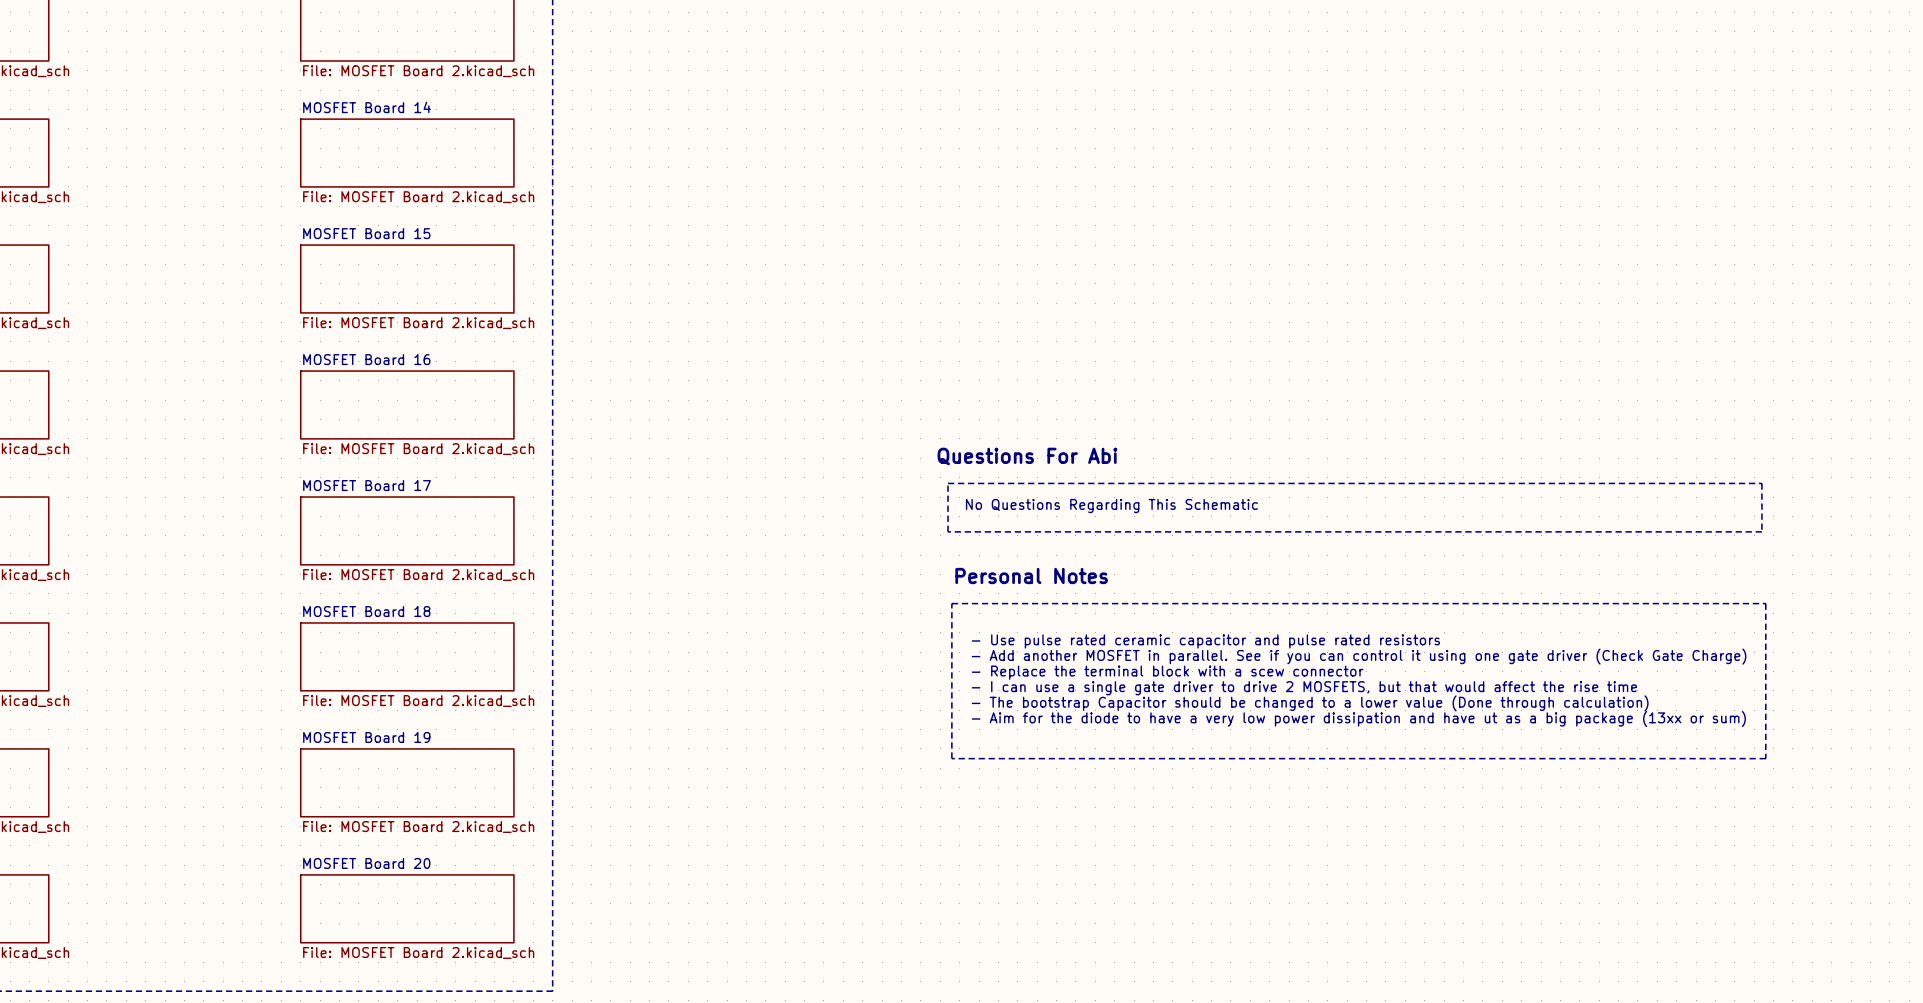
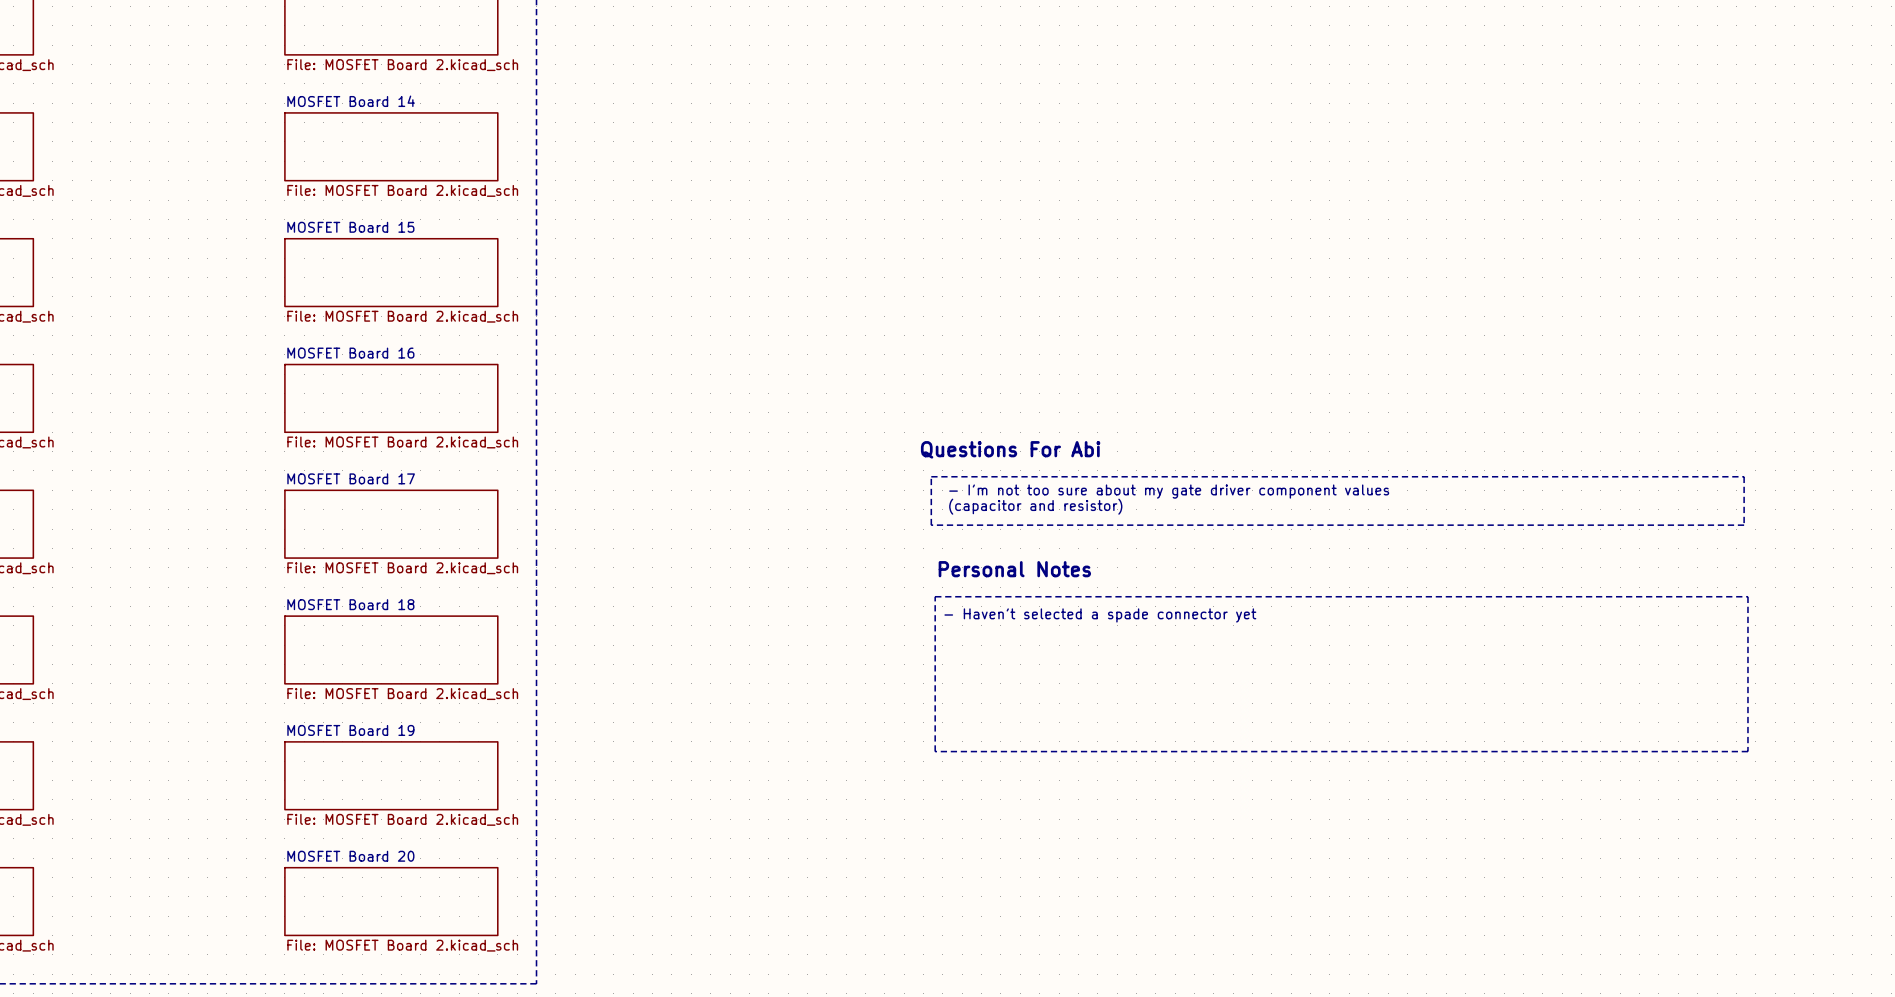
text: none -> - I'm not too sure about my gate driver component values (1169, 491)
text: No Questions Regarding This Schematic (1111, 506) -> none
text: none -> (capacitor and resistor) (1035, 506)
text: none -> - Haven't selected a spade connector yet (1100, 615)
text: - Use pulse rated ceramic capacitor and pulse rated resistors (1205, 641) -> none
text: - Add another MOSFET in parallel. See if you can control it using one gate driver (Check Gate Charge) (1359, 656) -> none
text: - Replace the terminal block with a scew connector (1167, 672) -> none
text: - I can use a single gate driver to drive 2 MOSFETS, but that would affect the rise time (1304, 688) -> none
text: - The bootstrap Capacitor should be changed to a lower value (Done through calculation) (1310, 703) -> none
text: - Aim for the diode to have a very low power dissipation and have ut as a big package (13xx or sum) (1358, 719) -> none

